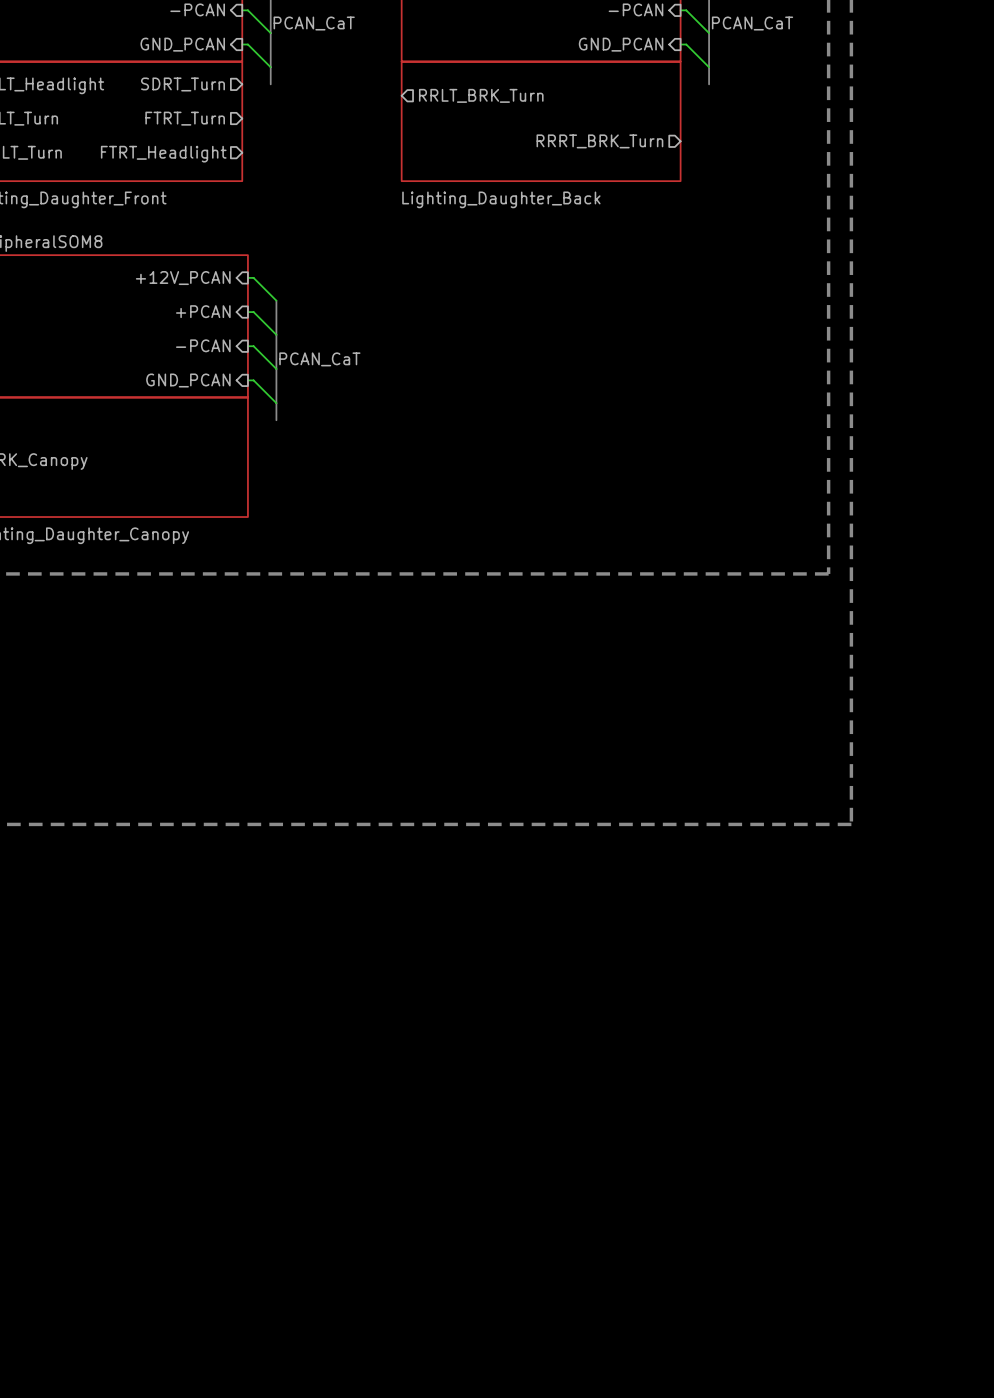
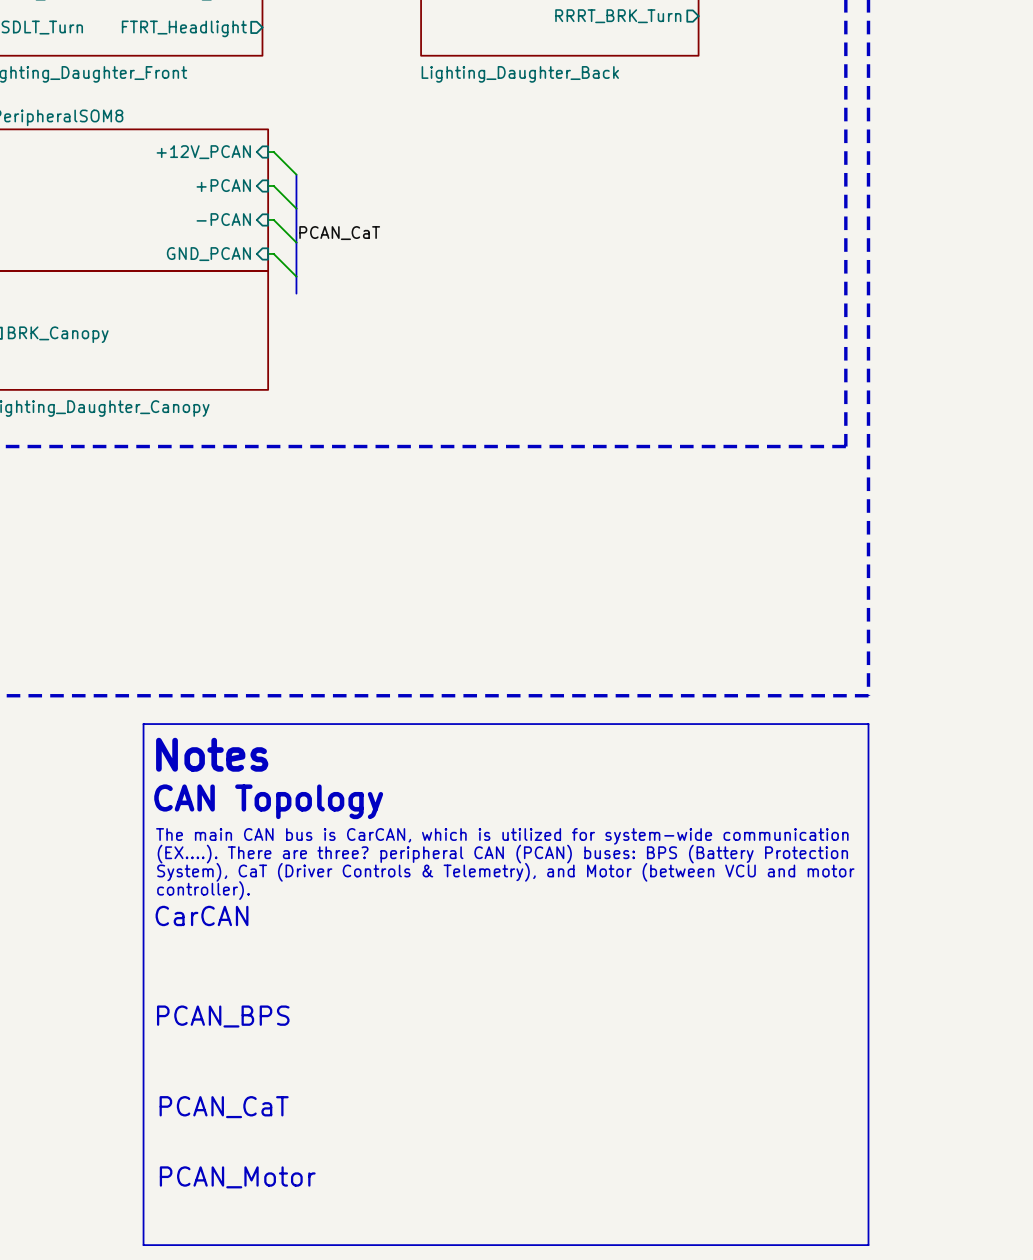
line: none -> (143, 724) (868, 724) (868, 1245) (143, 1245) (143, 724)
text: none -> Notes (212, 754)
text: none -> CAN Topology (268, 801)
text: none -> The main CAN bus is CarCAN, which is utilized for system-wide communication (502, 836)
text: none -> (EX....). There are three? peripheral CAN (PCAN) buses: BPS (Battery Protection (502, 854)
text: none -> System), CaT (Driver Controls & Telemetry), and Motor (between VCU and motor (505, 872)
text: none -> controller). (203, 890)
text: none -> CarCAN (202, 915)
text: none -> PCAN_BPS (223, 1016)
text: none -> PCAN_CaT (224, 1107)
text: none -> PCAN_Motor (237, 1177)

